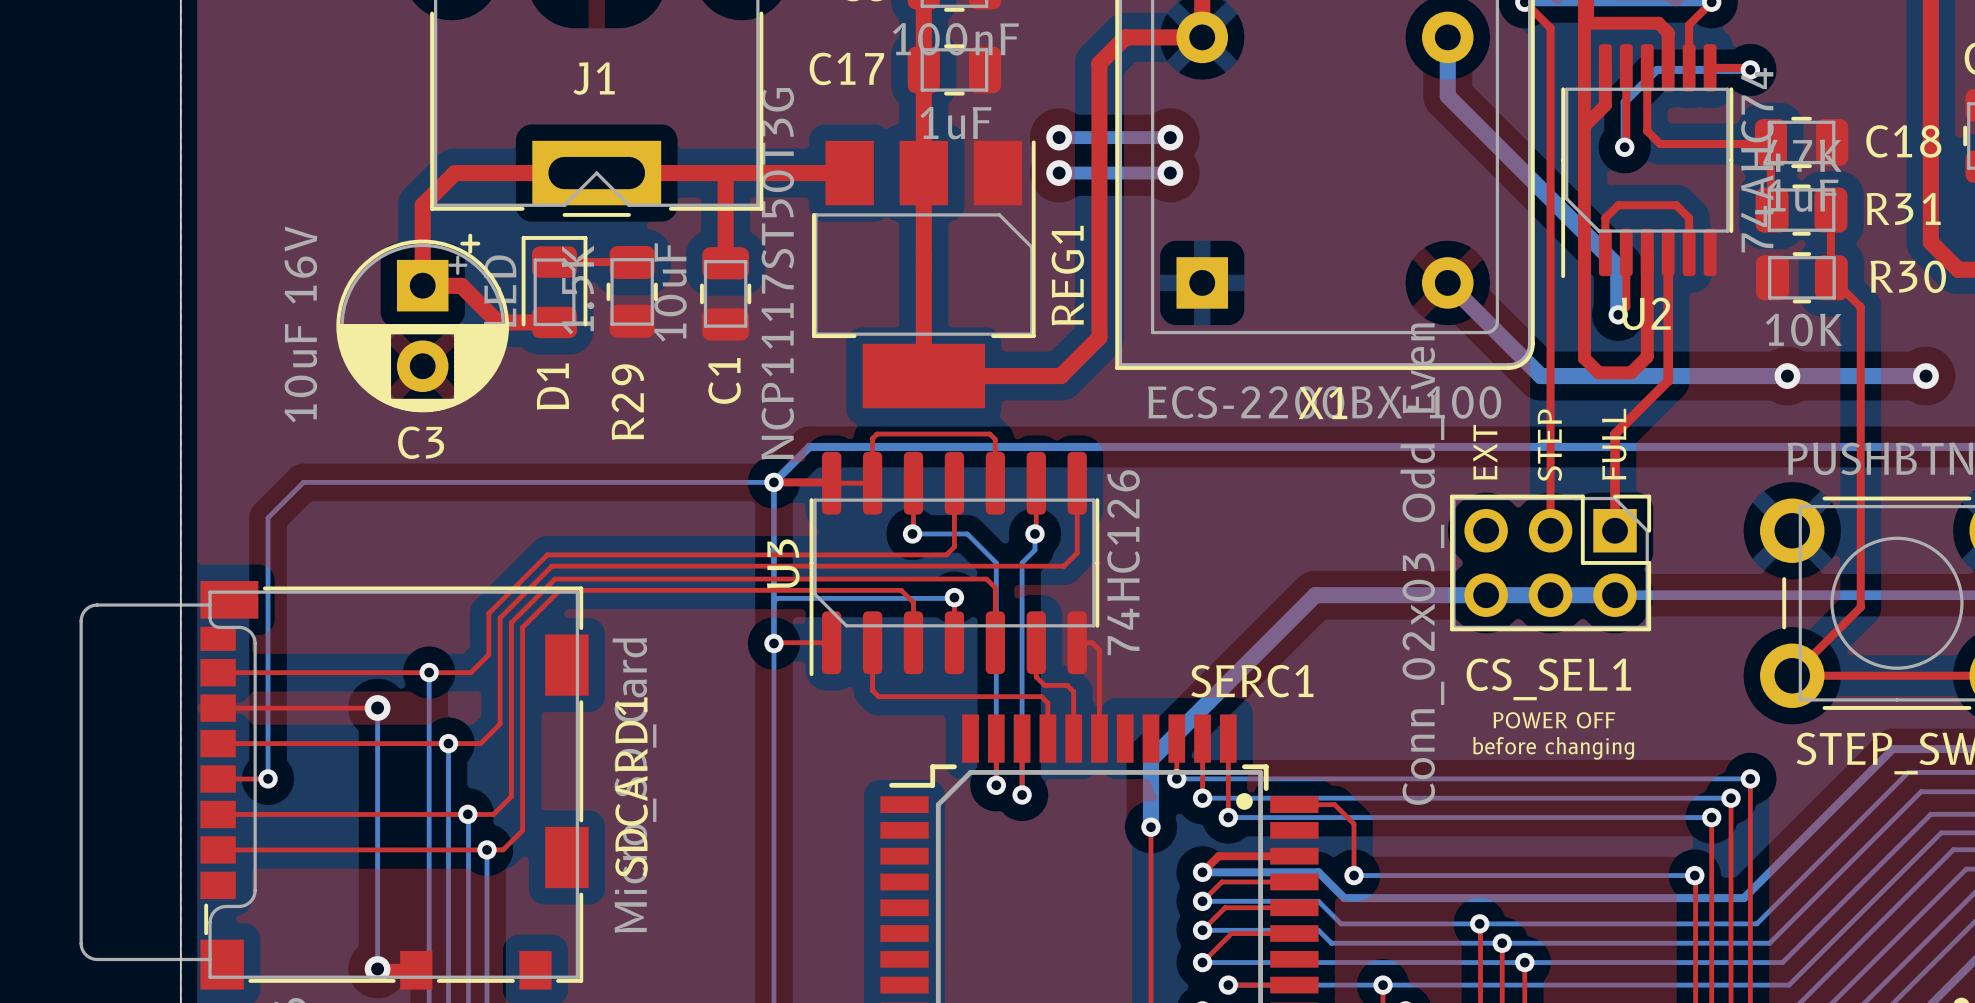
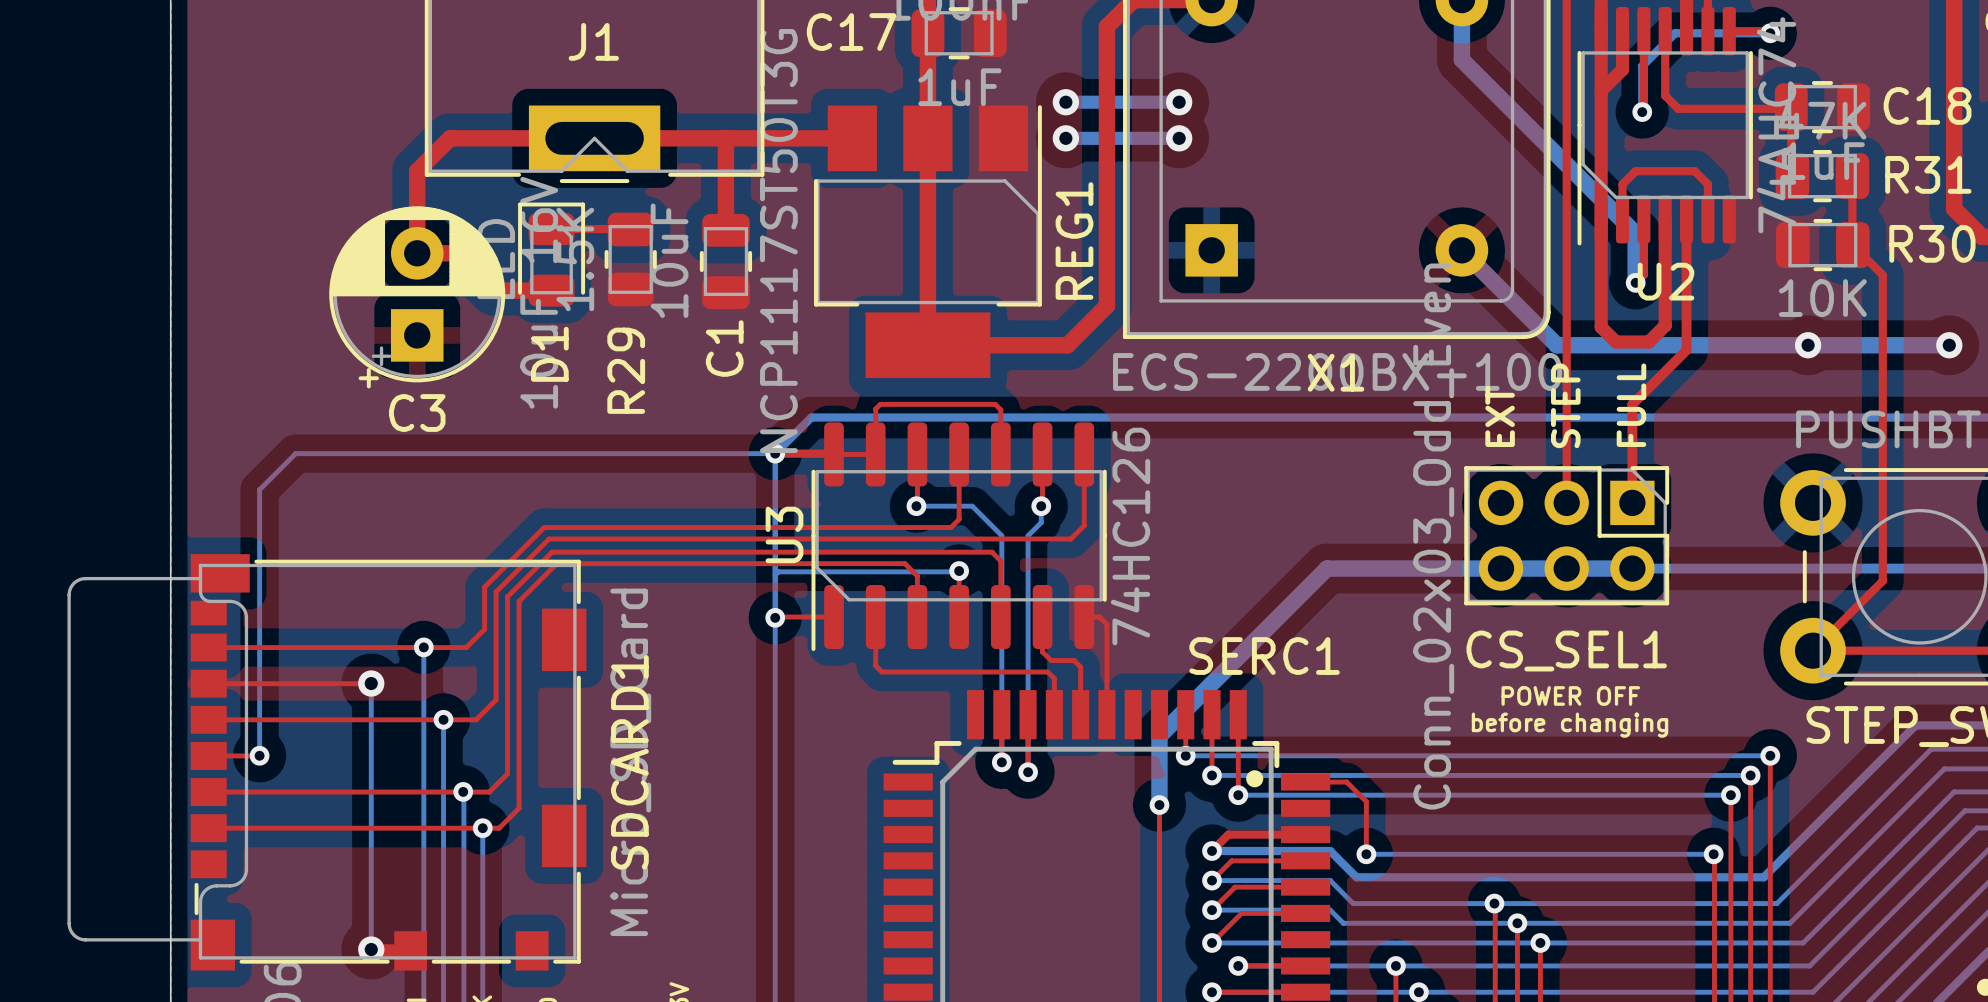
C3 rotation: 0° (422, 322) -> 180° (417, 297)

